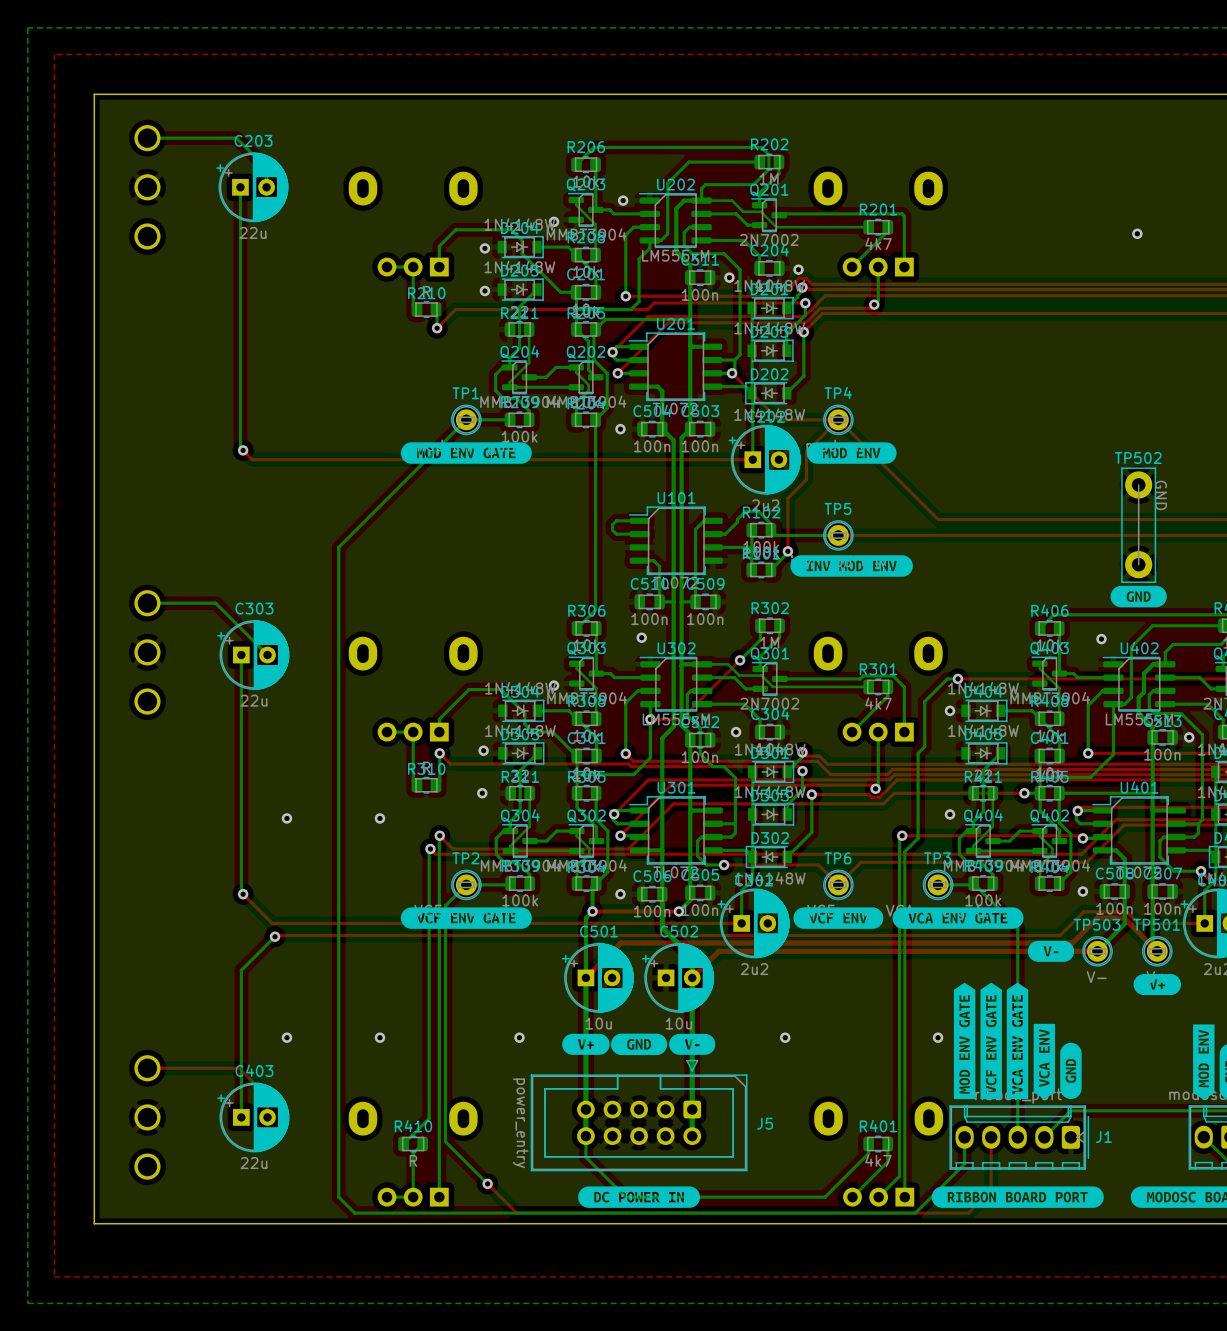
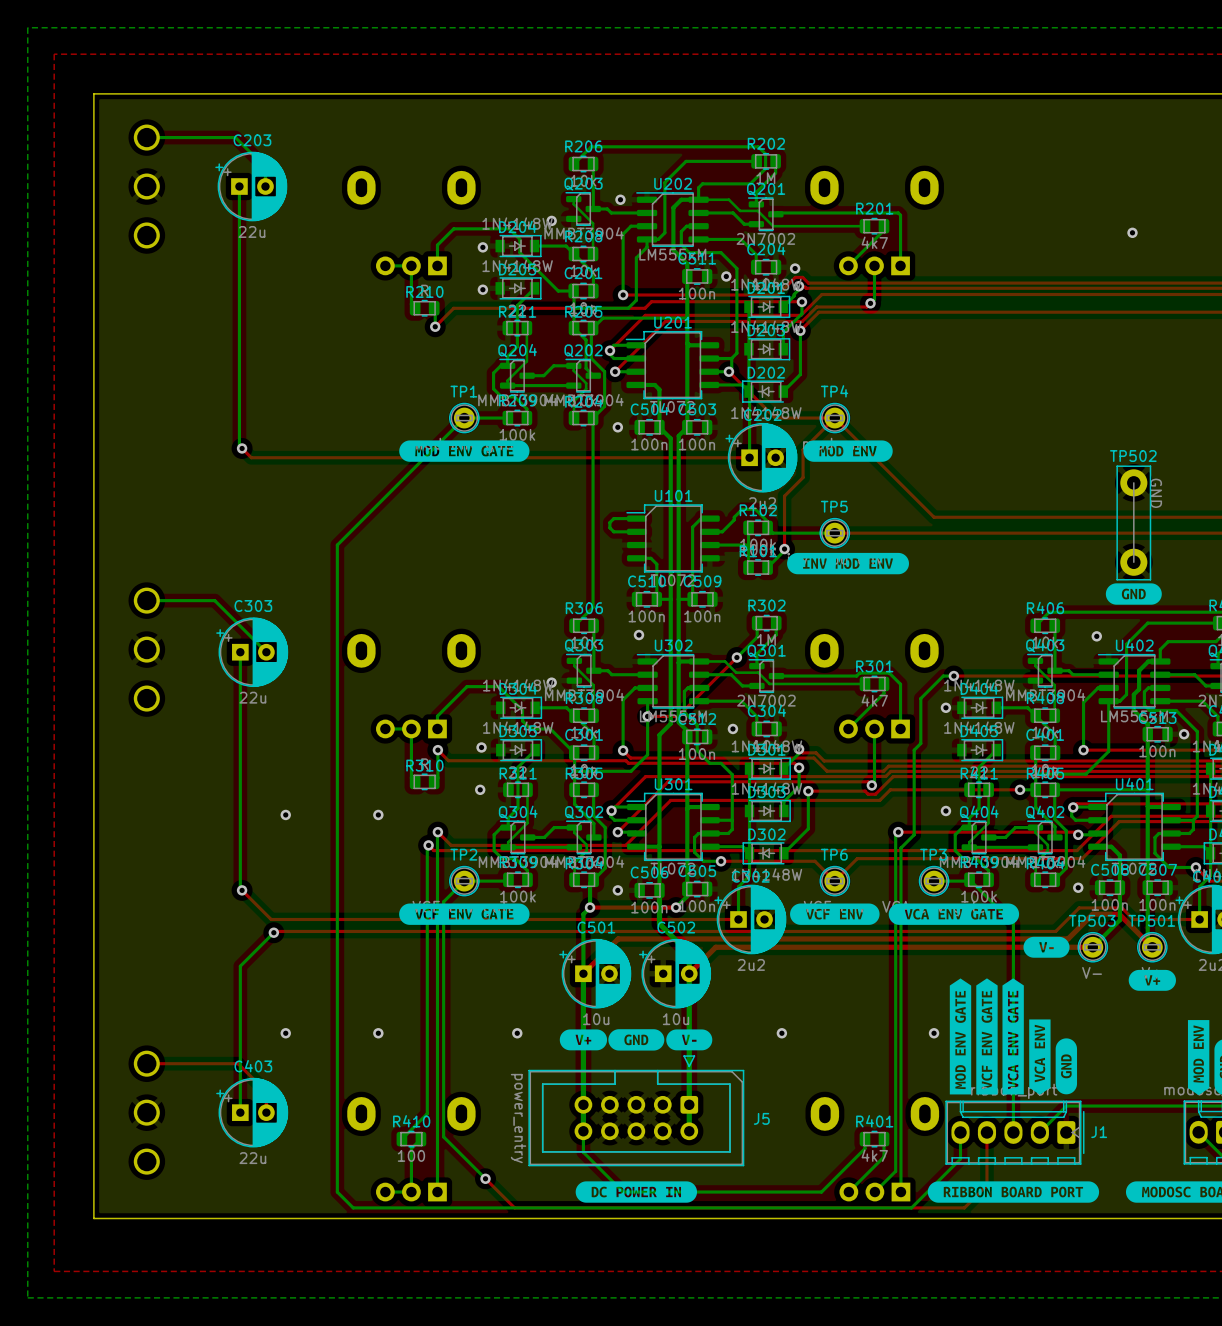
R410 value: R (413, 1160) -> 100 (411, 1155)

